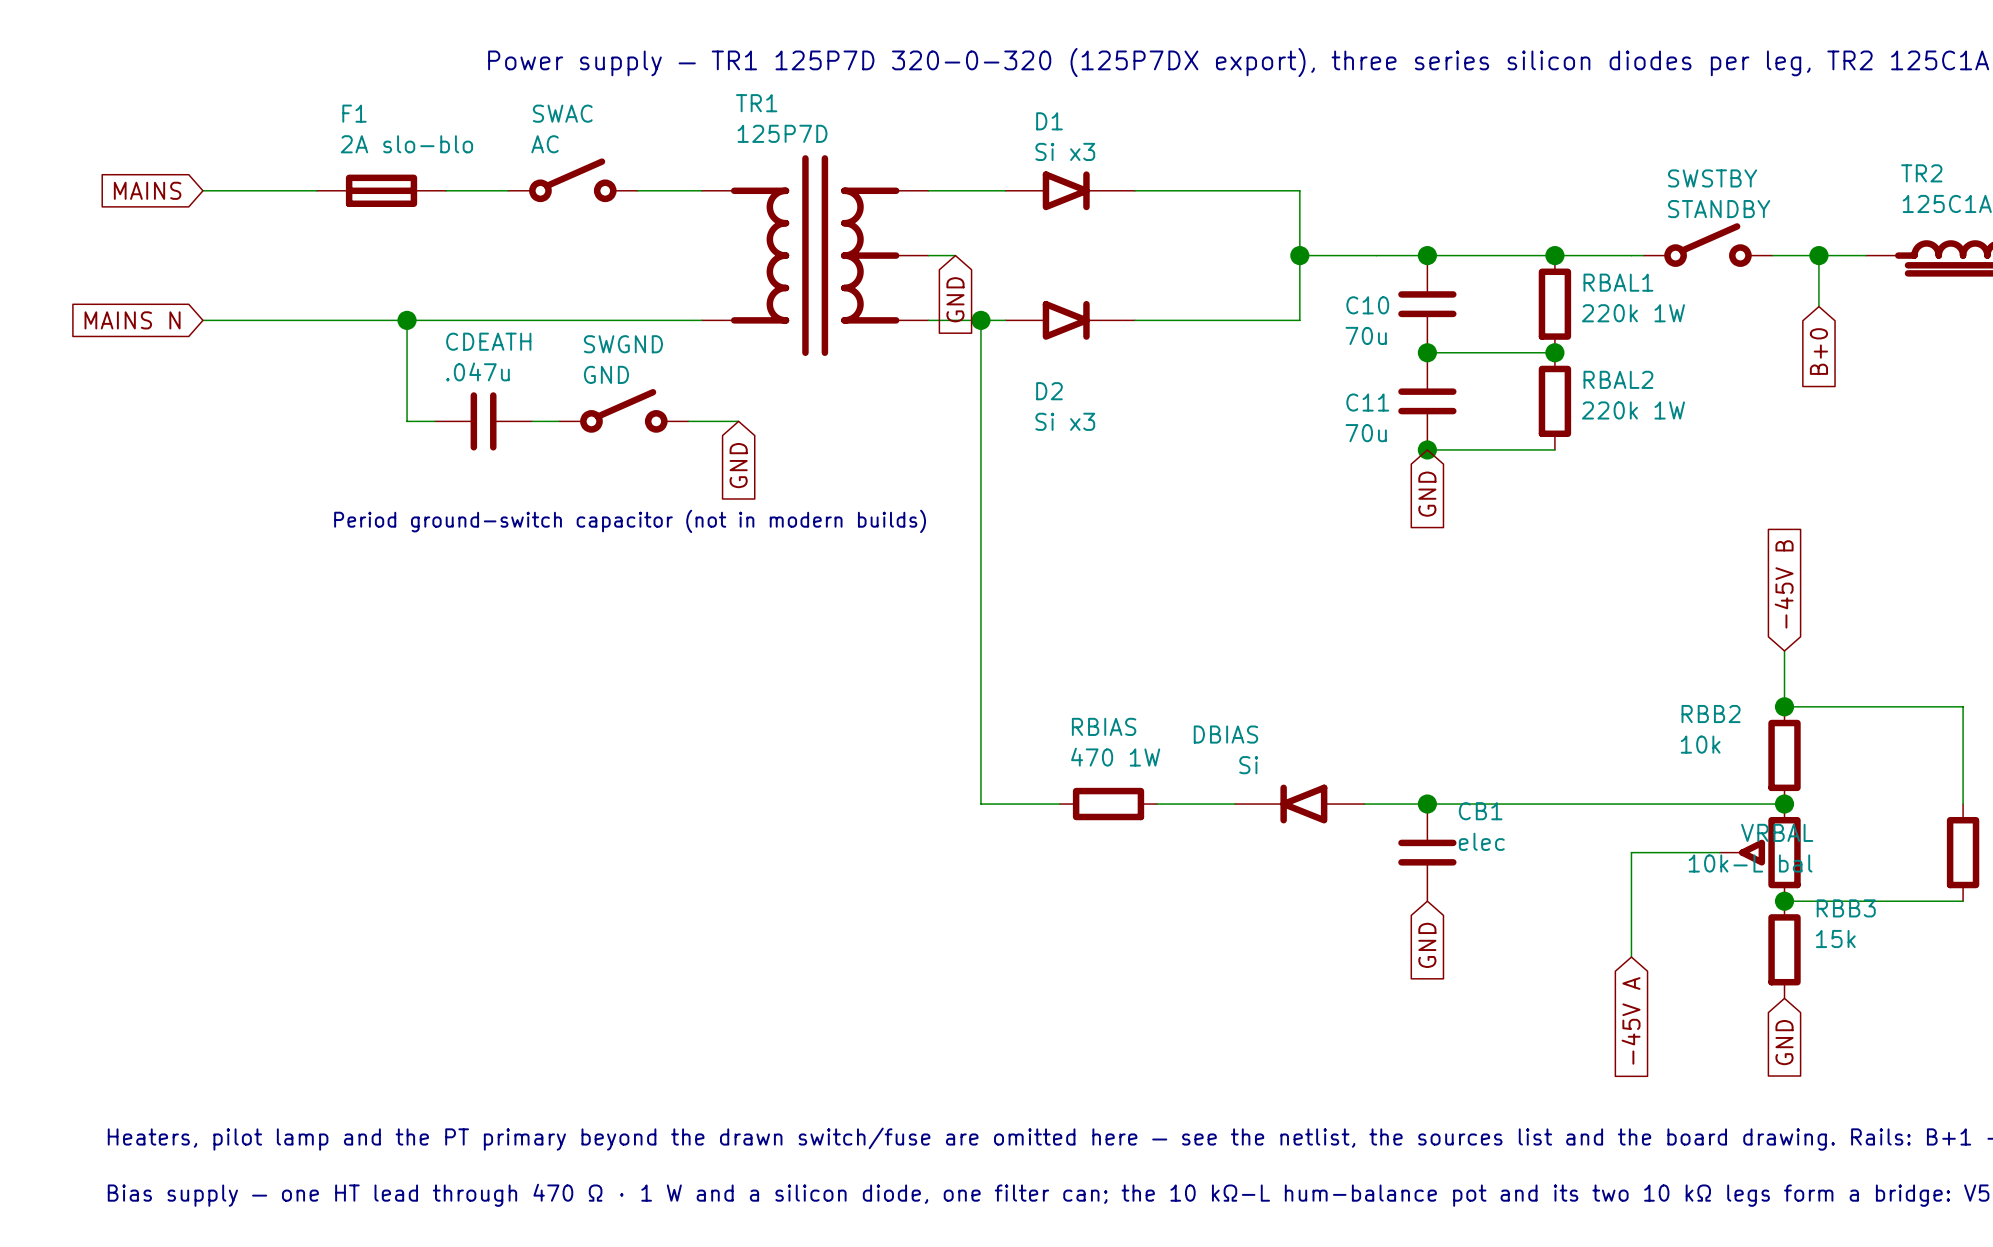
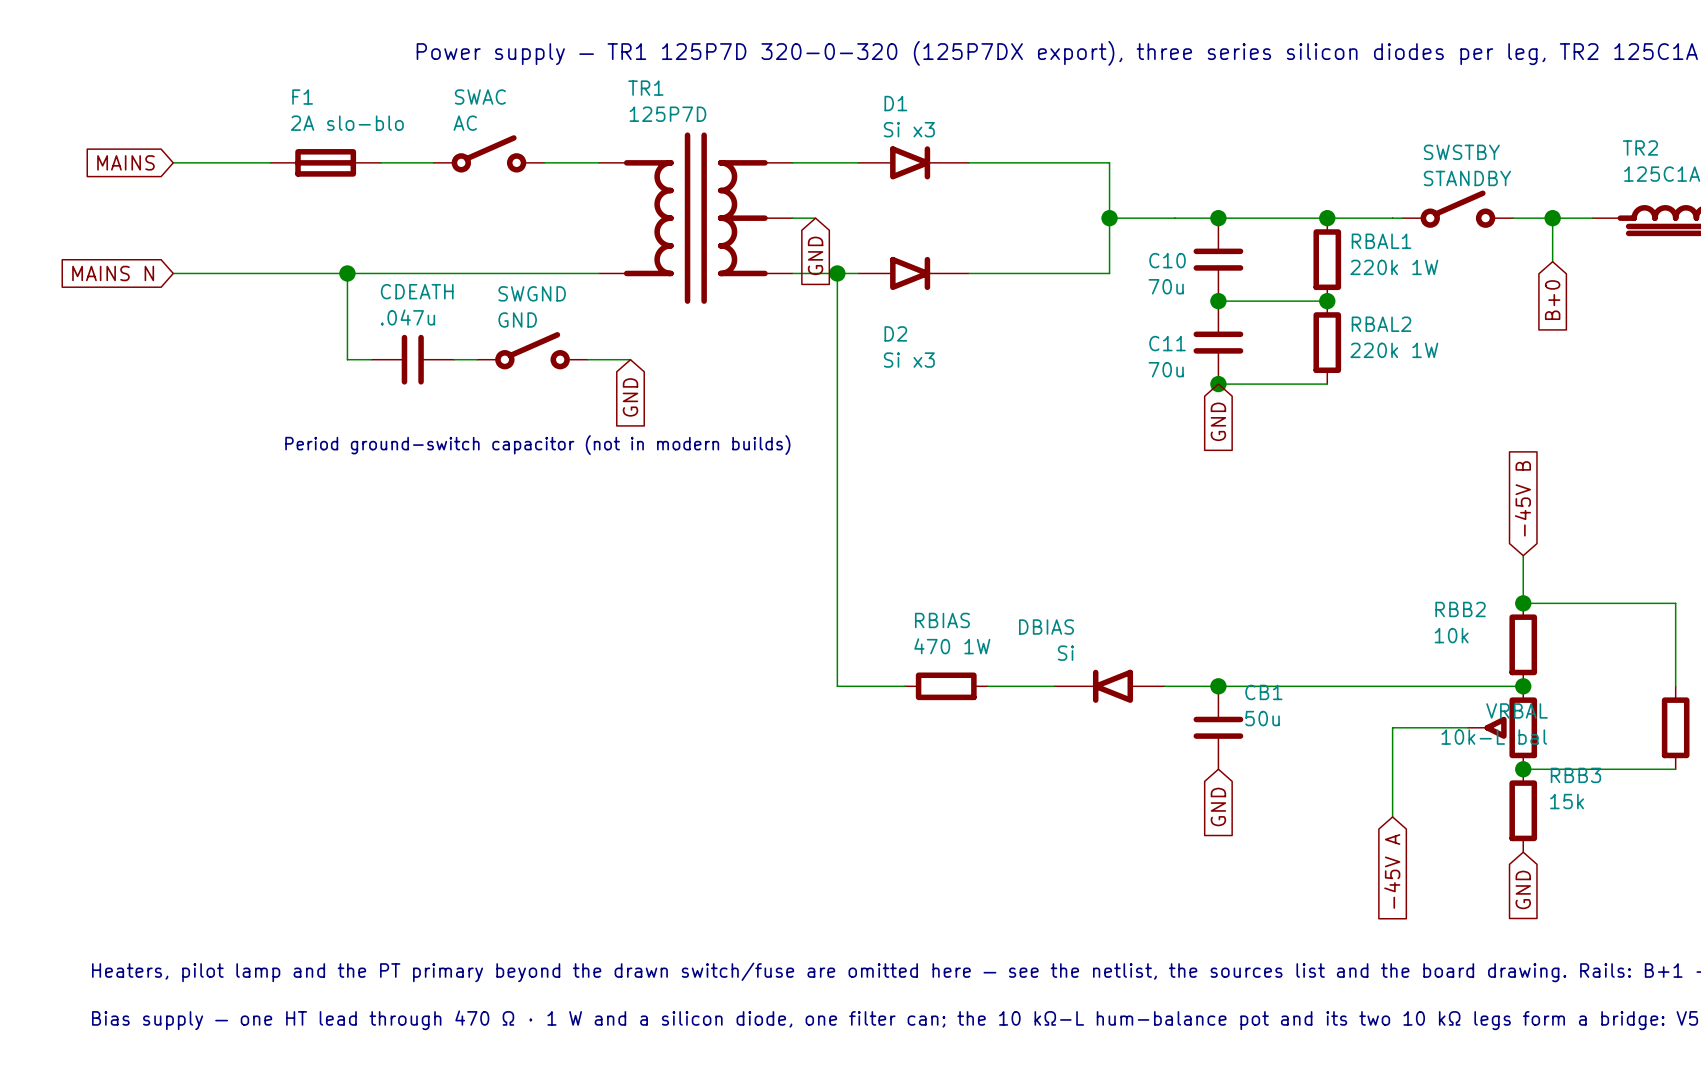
CB1 value: elec (1481, 841) -> 50u (1262, 718)

